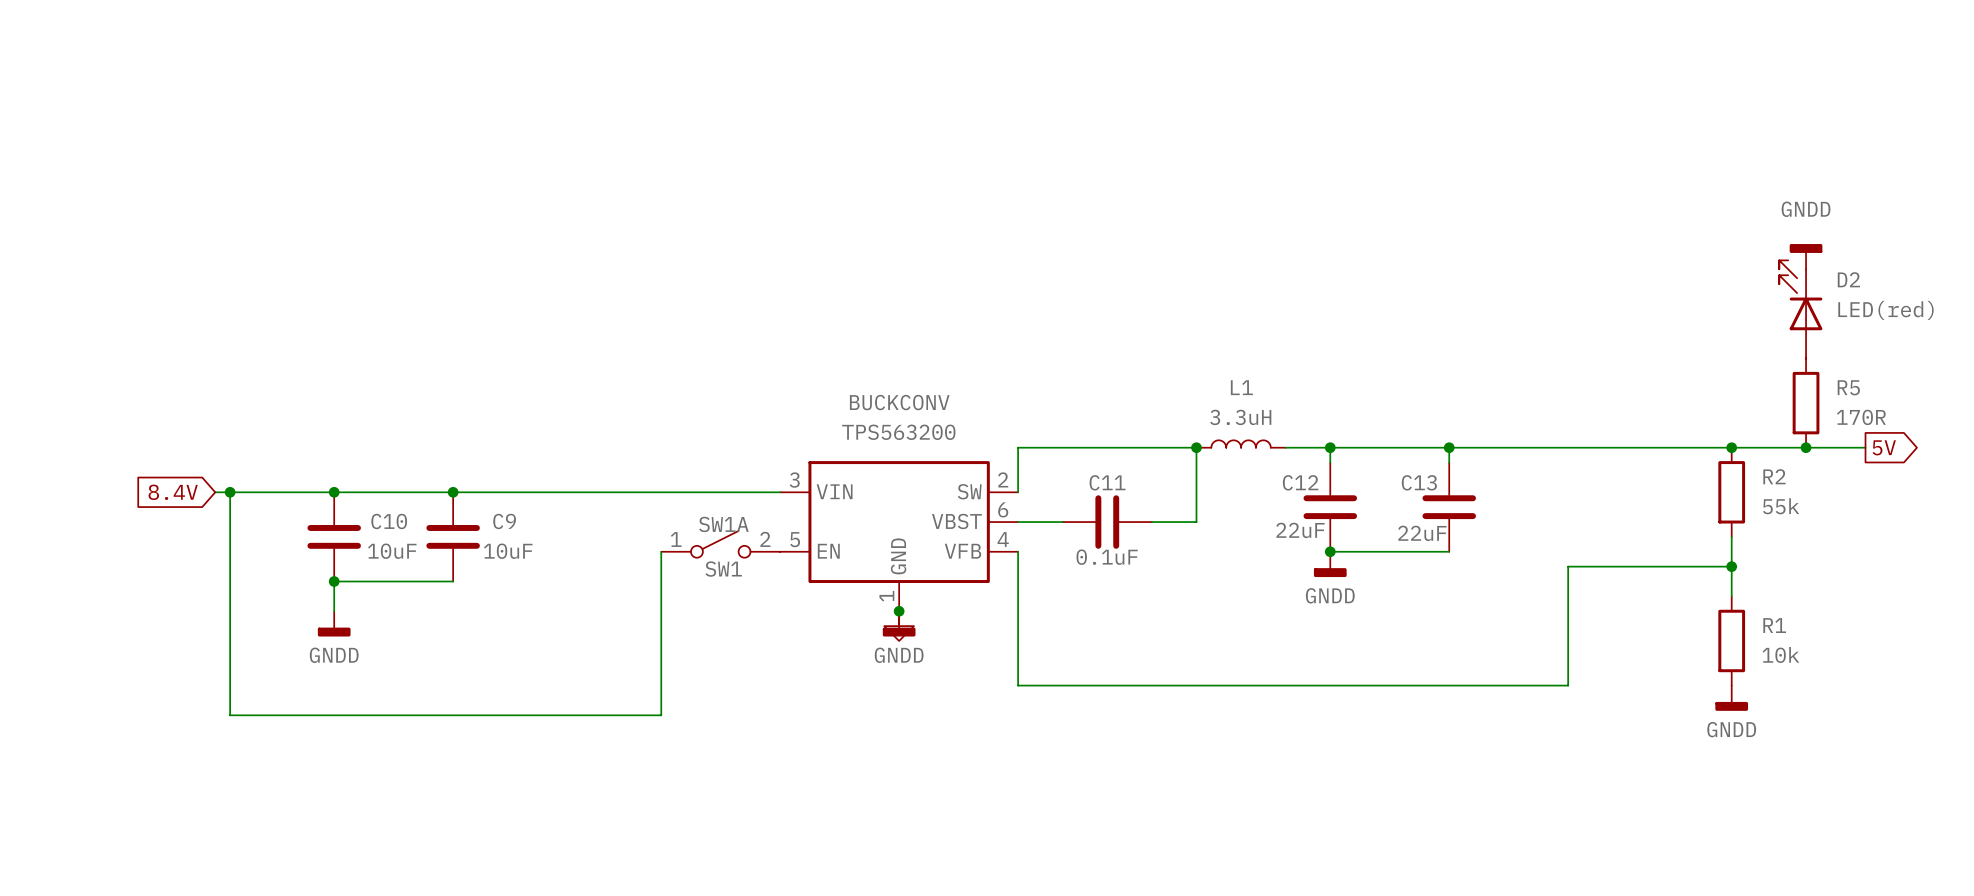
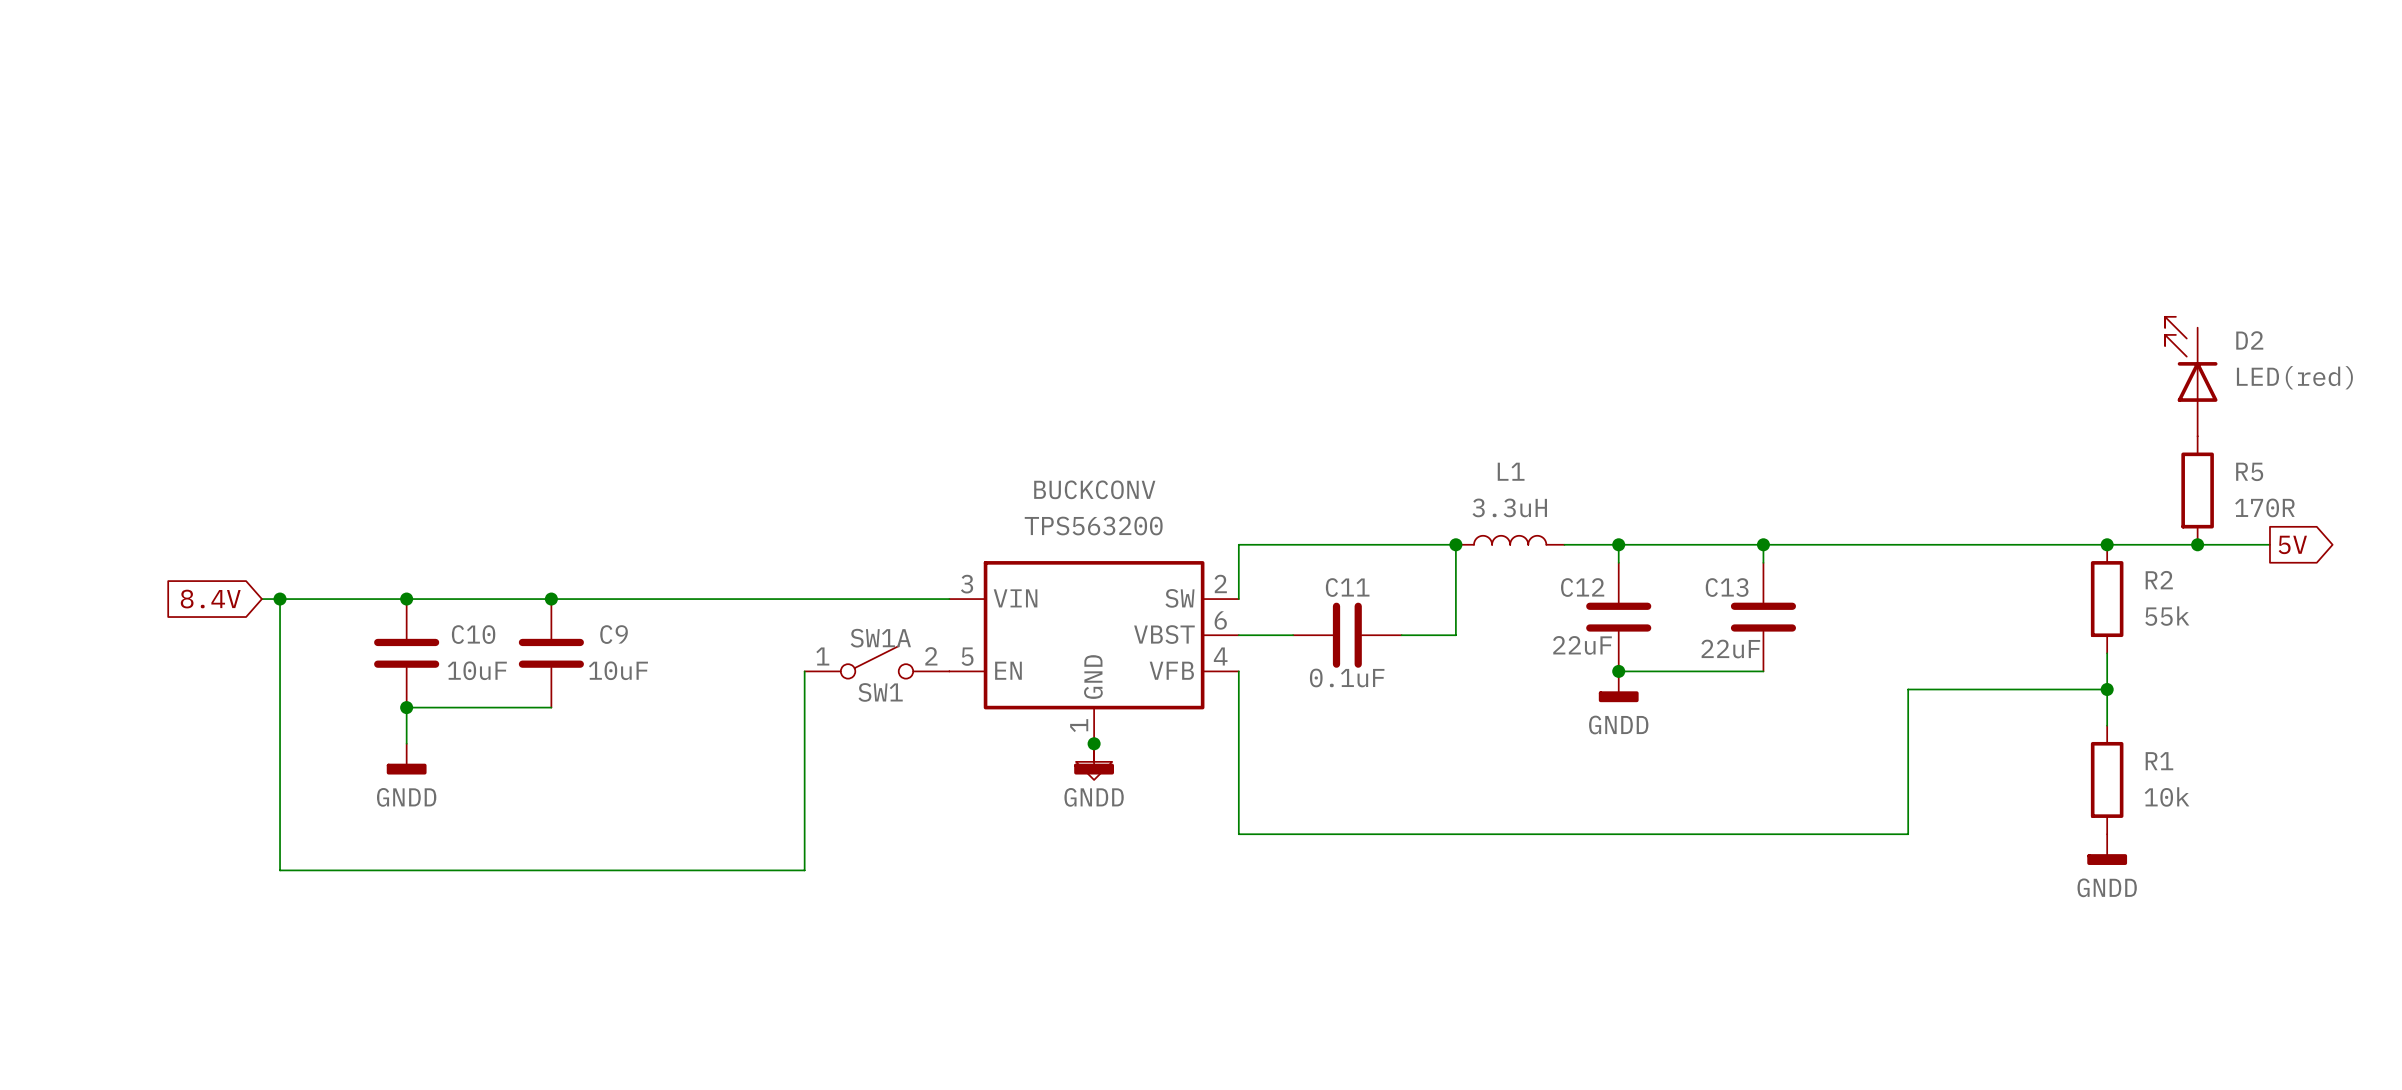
power symbol: GNDD (1806, 256) -> none

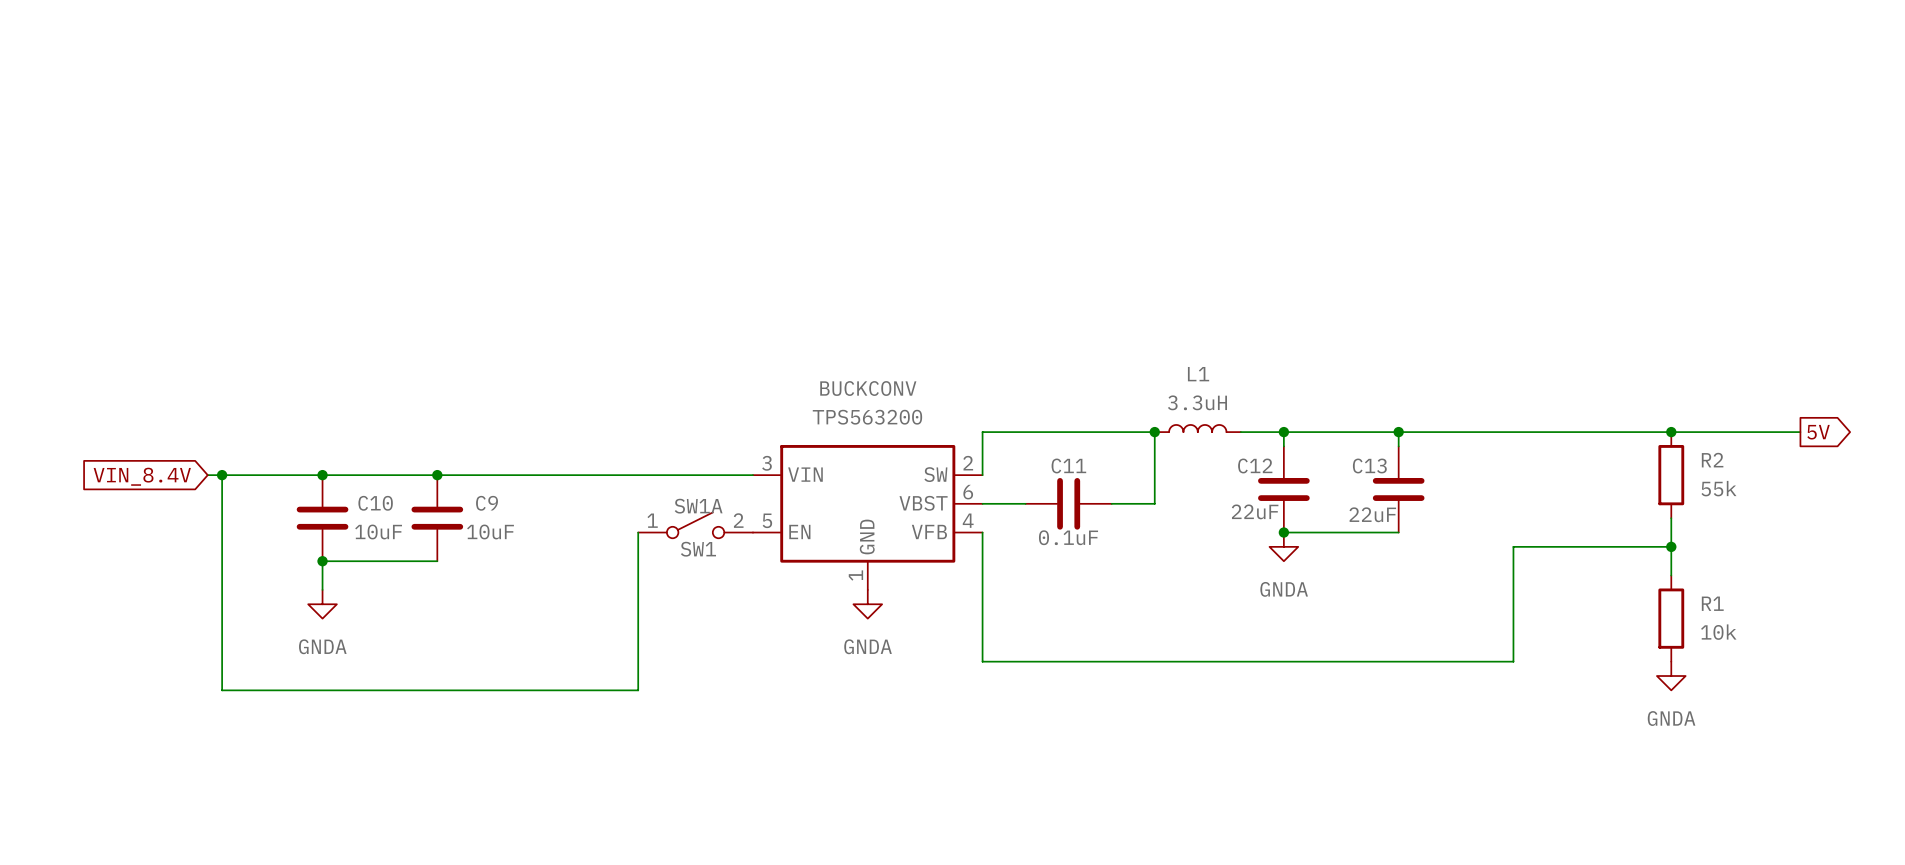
D2: LED(red) (2191, 376) -> none
R5: 170R (2197, 490) -> none
junction: (2197, 544) -> none
global label: 8.4V (210, 599) -> VIN_8.4V (142, 476)
power symbol: GNDD (1618, 686) -> GNDA (1283, 546)
junction: (1094, 743) -> none
power symbol: GNDD (406, 759) -> GNDA (322, 604)
power symbol: GNDD (1094, 759) -> none
power symbol text: none -> GNDA (868, 646)
power symbol: GNDD (2107, 849) -> GNDA (1671, 676)

